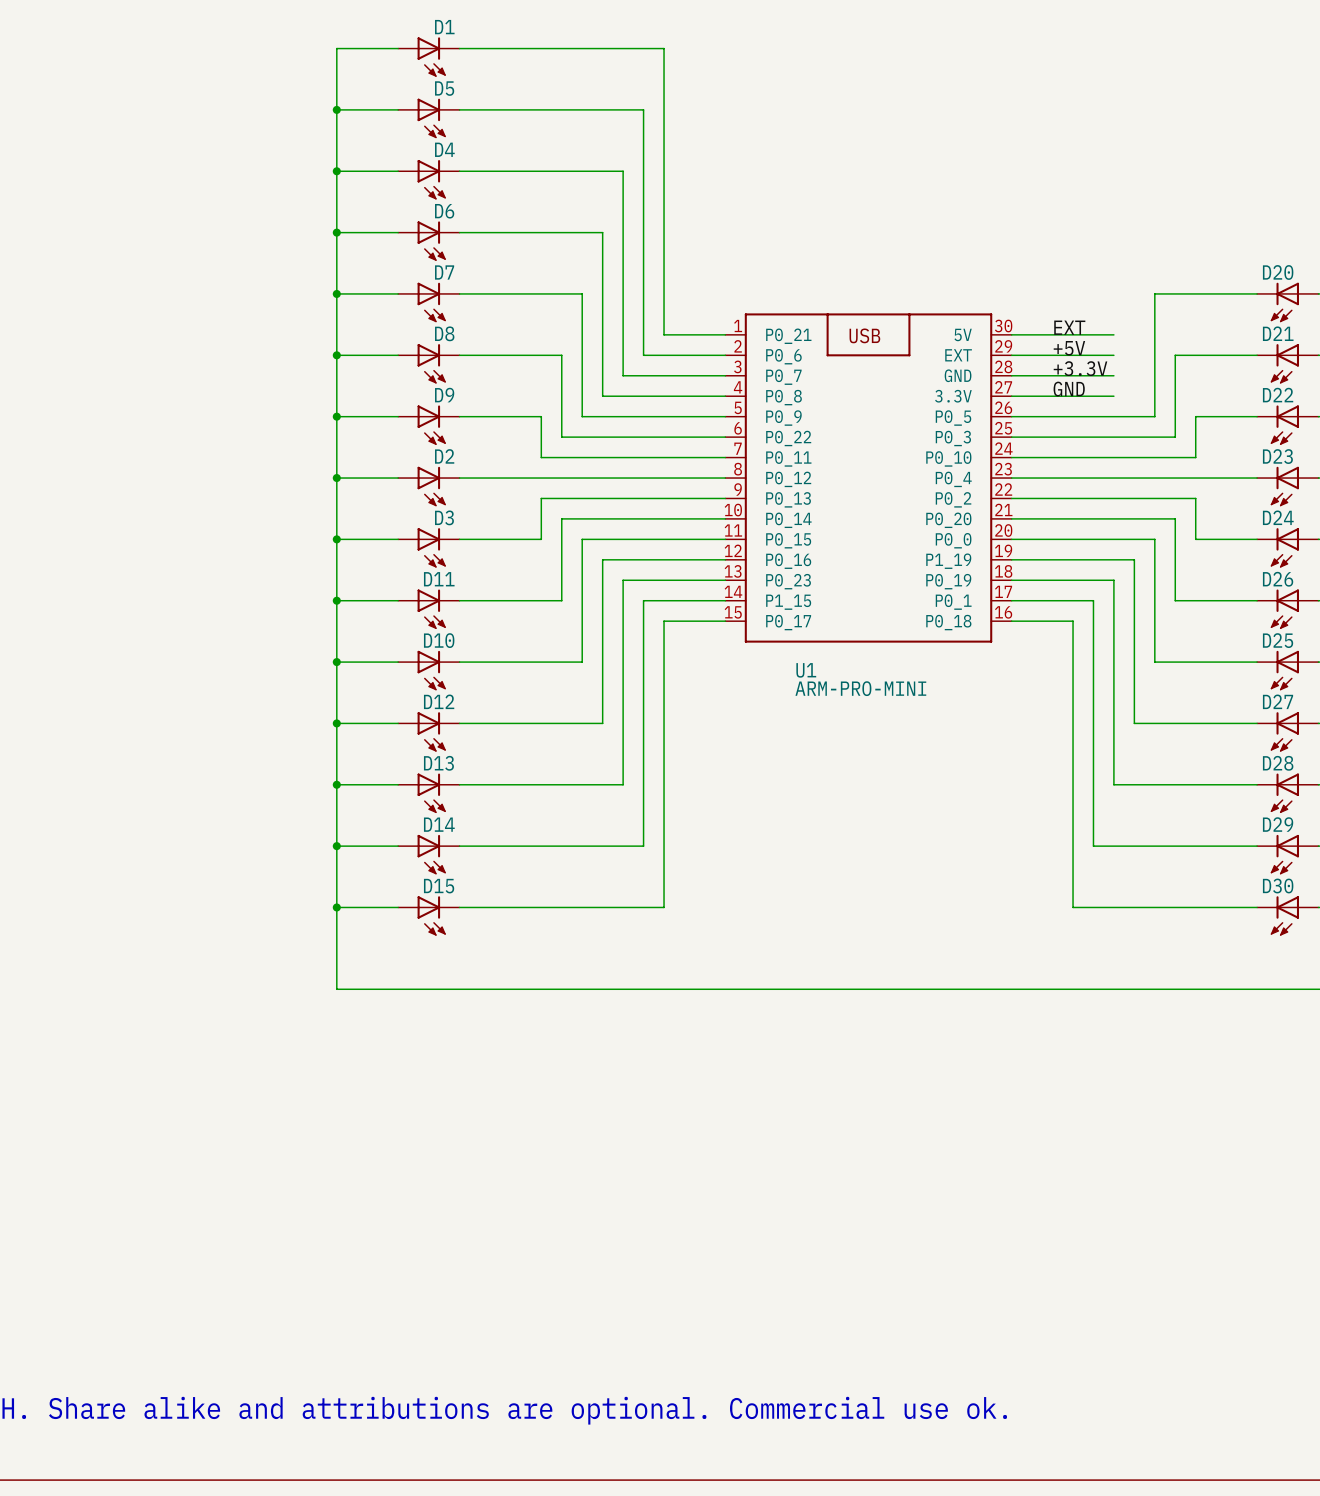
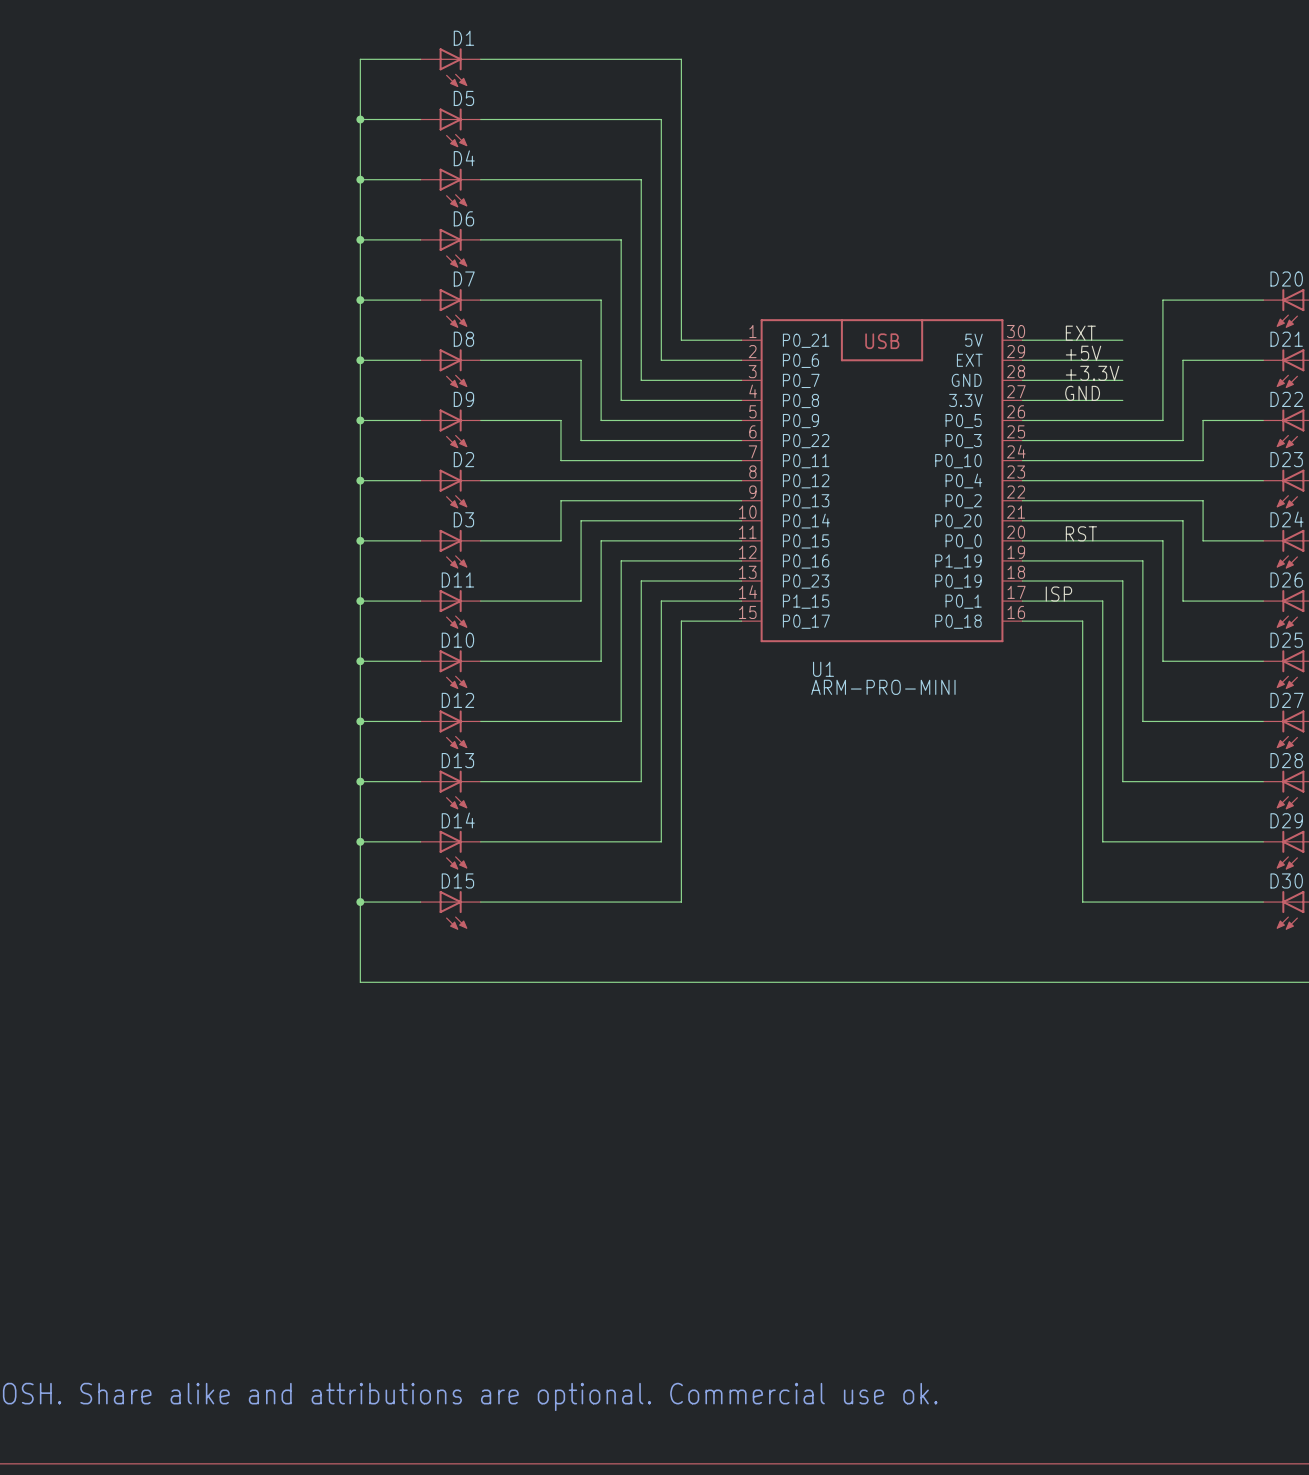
label: none -> RST (1081, 533)
label: none -> ISP (1058, 594)

